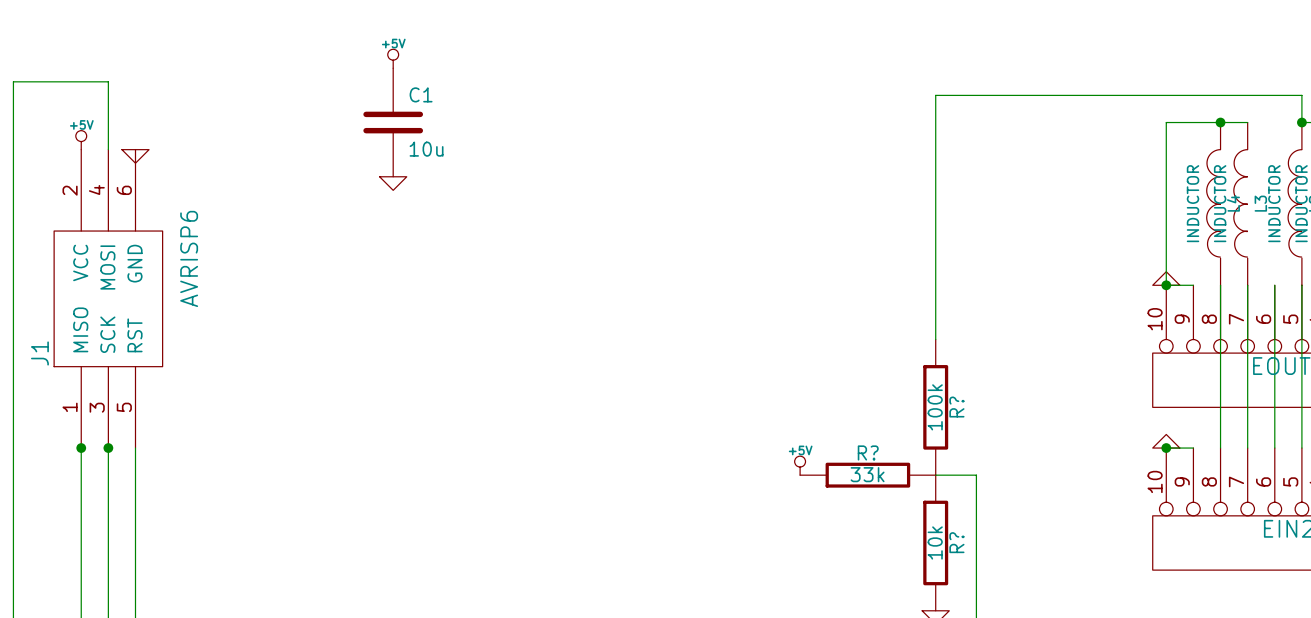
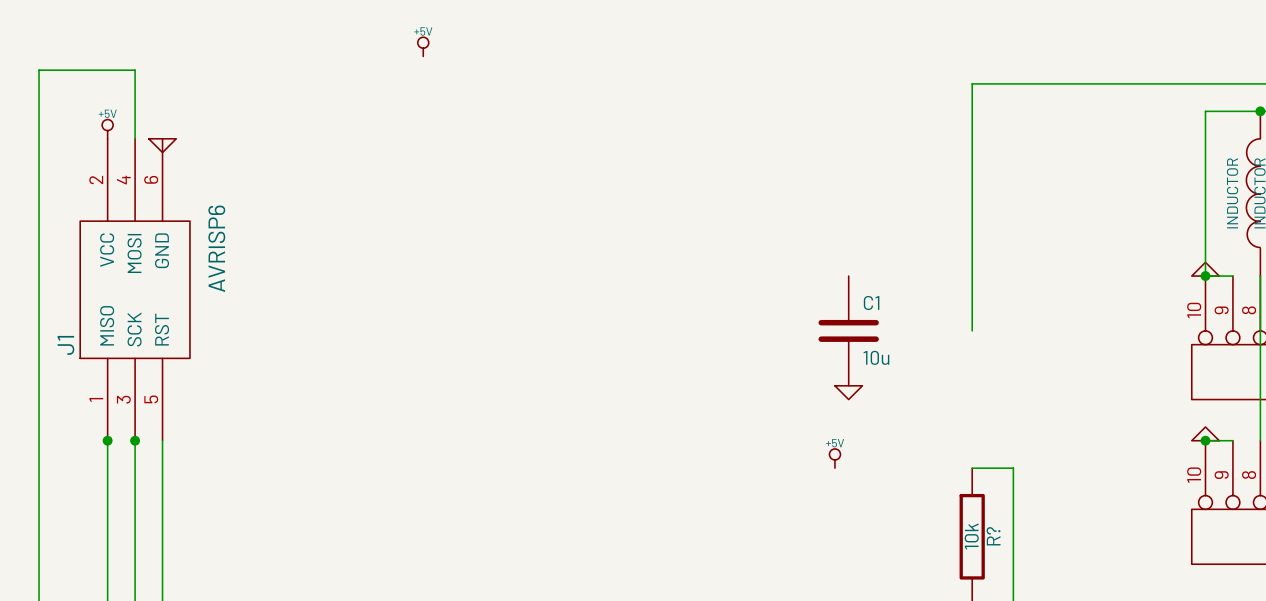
C1 position: (393, 122) -> (848, 330)
power symbol: (393, 183) -> none
power symbol: none -> (848, 392)
R?: 100k (935, 407) -> none
R?: 33k (867, 475) -> none

